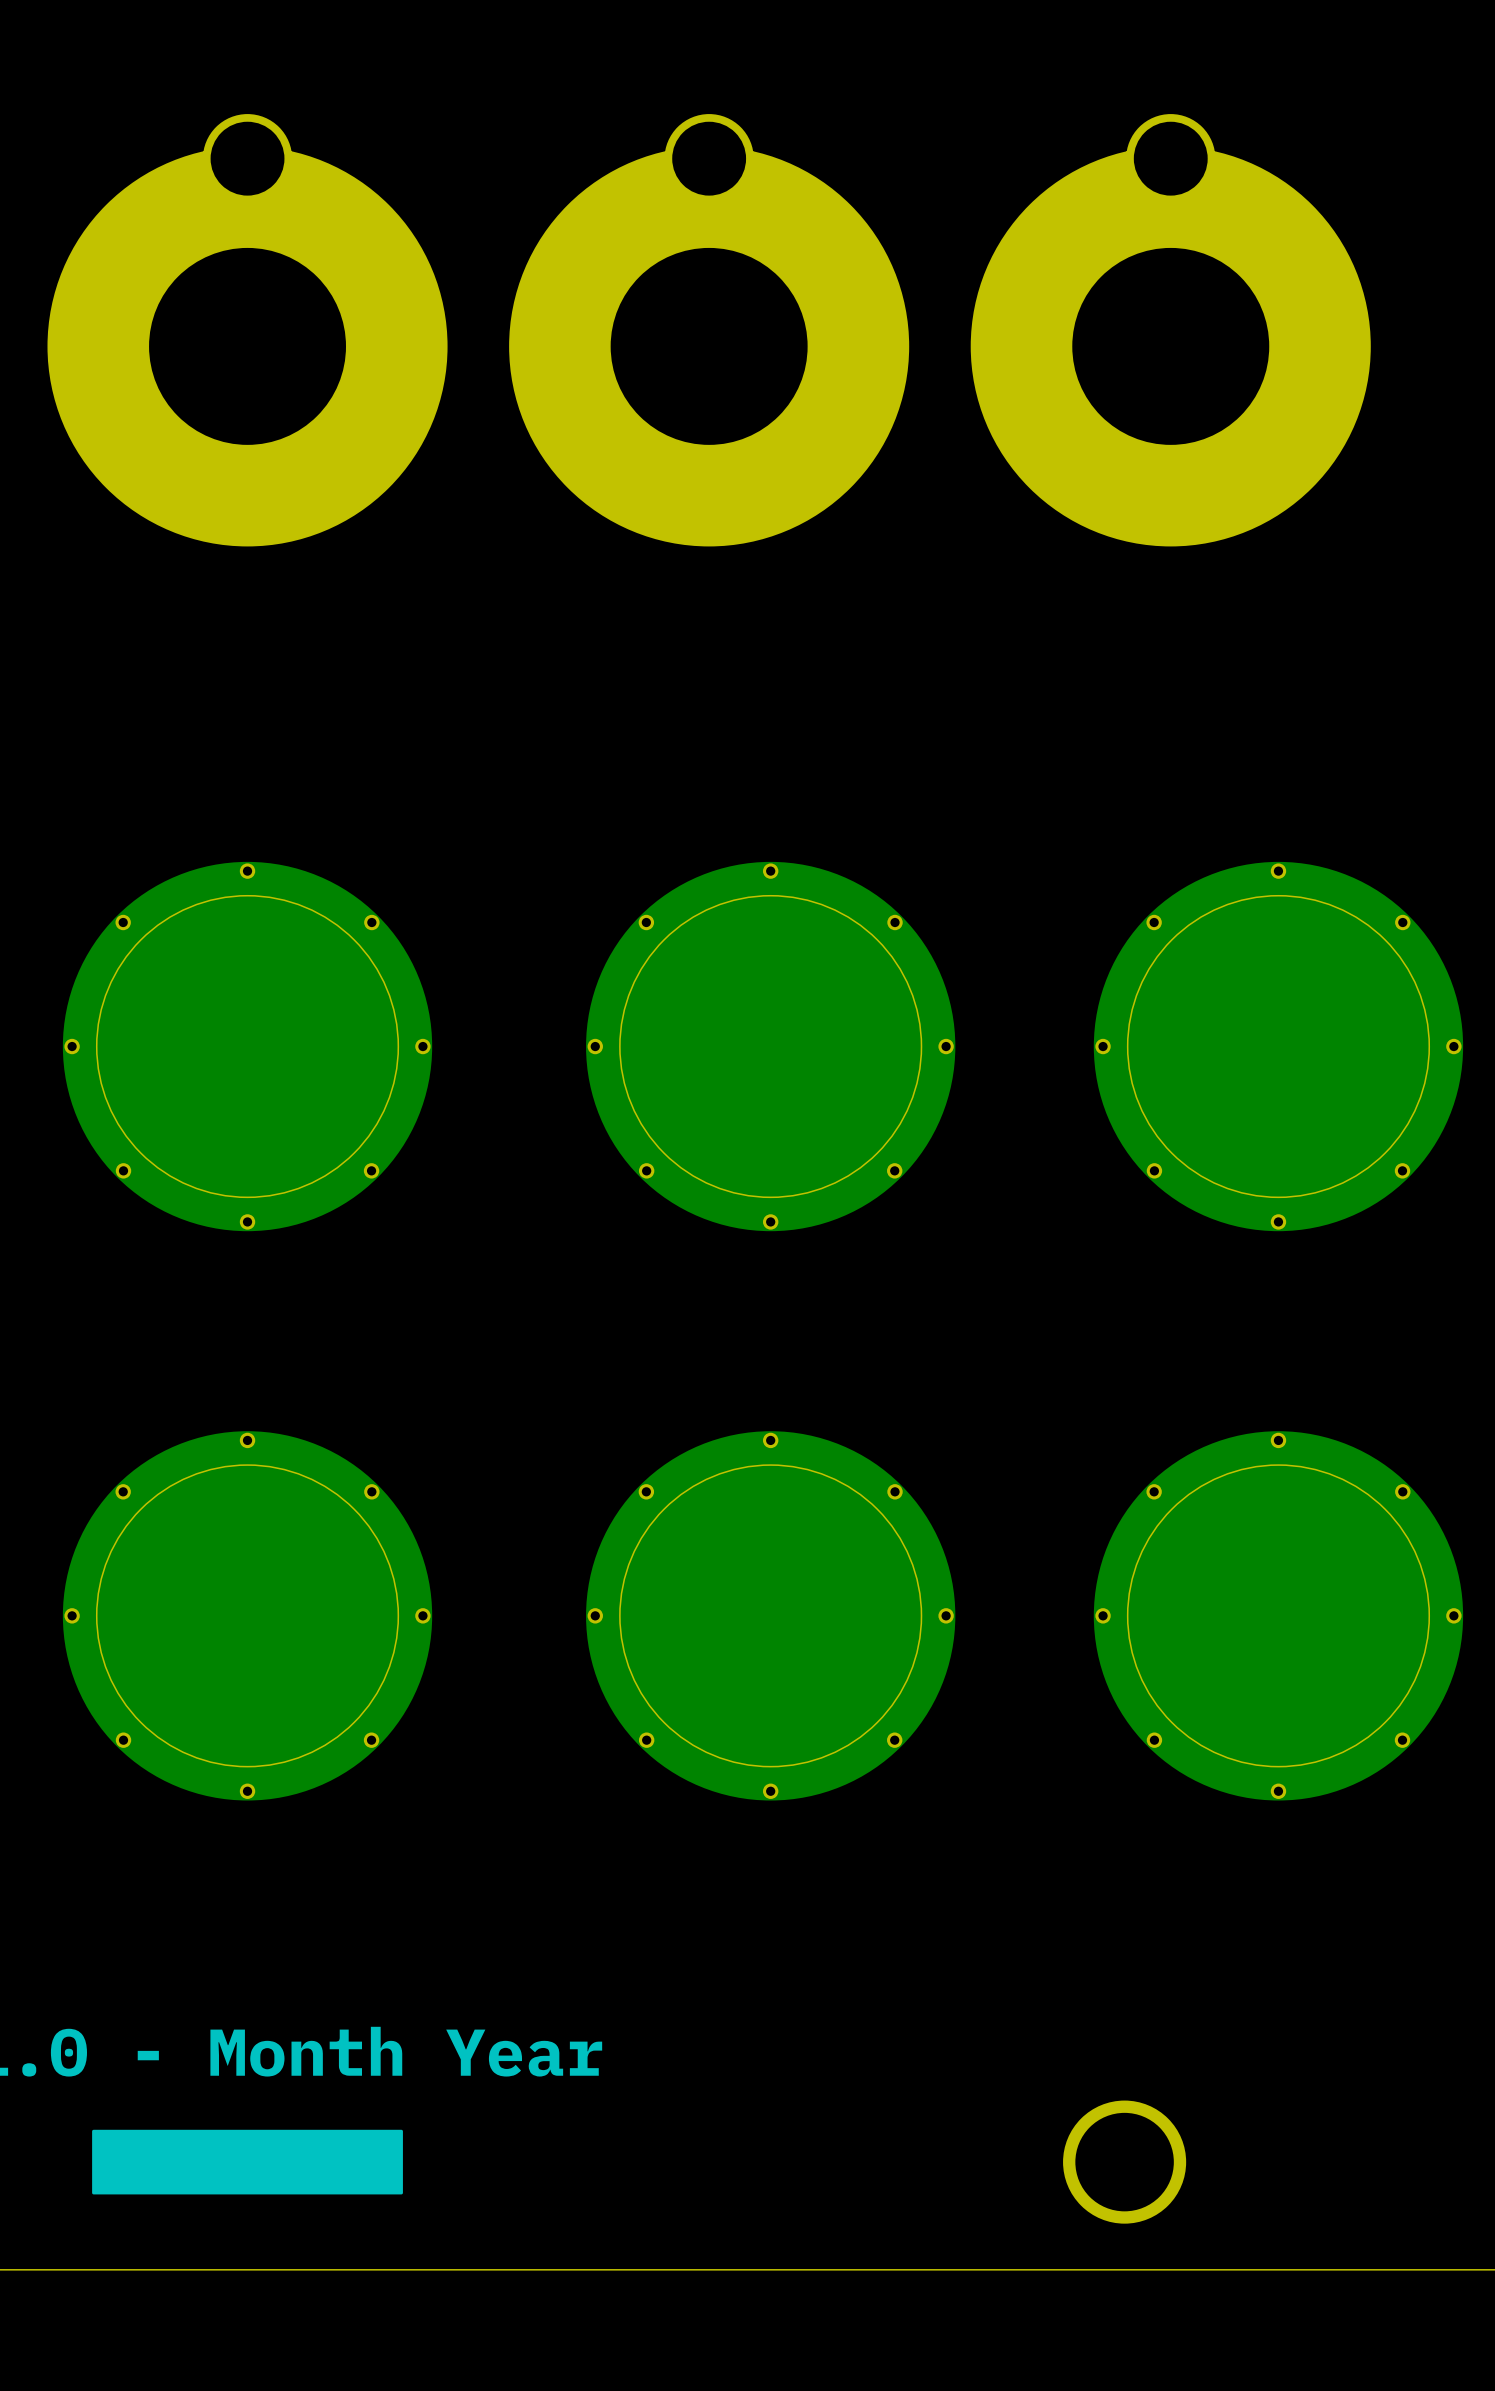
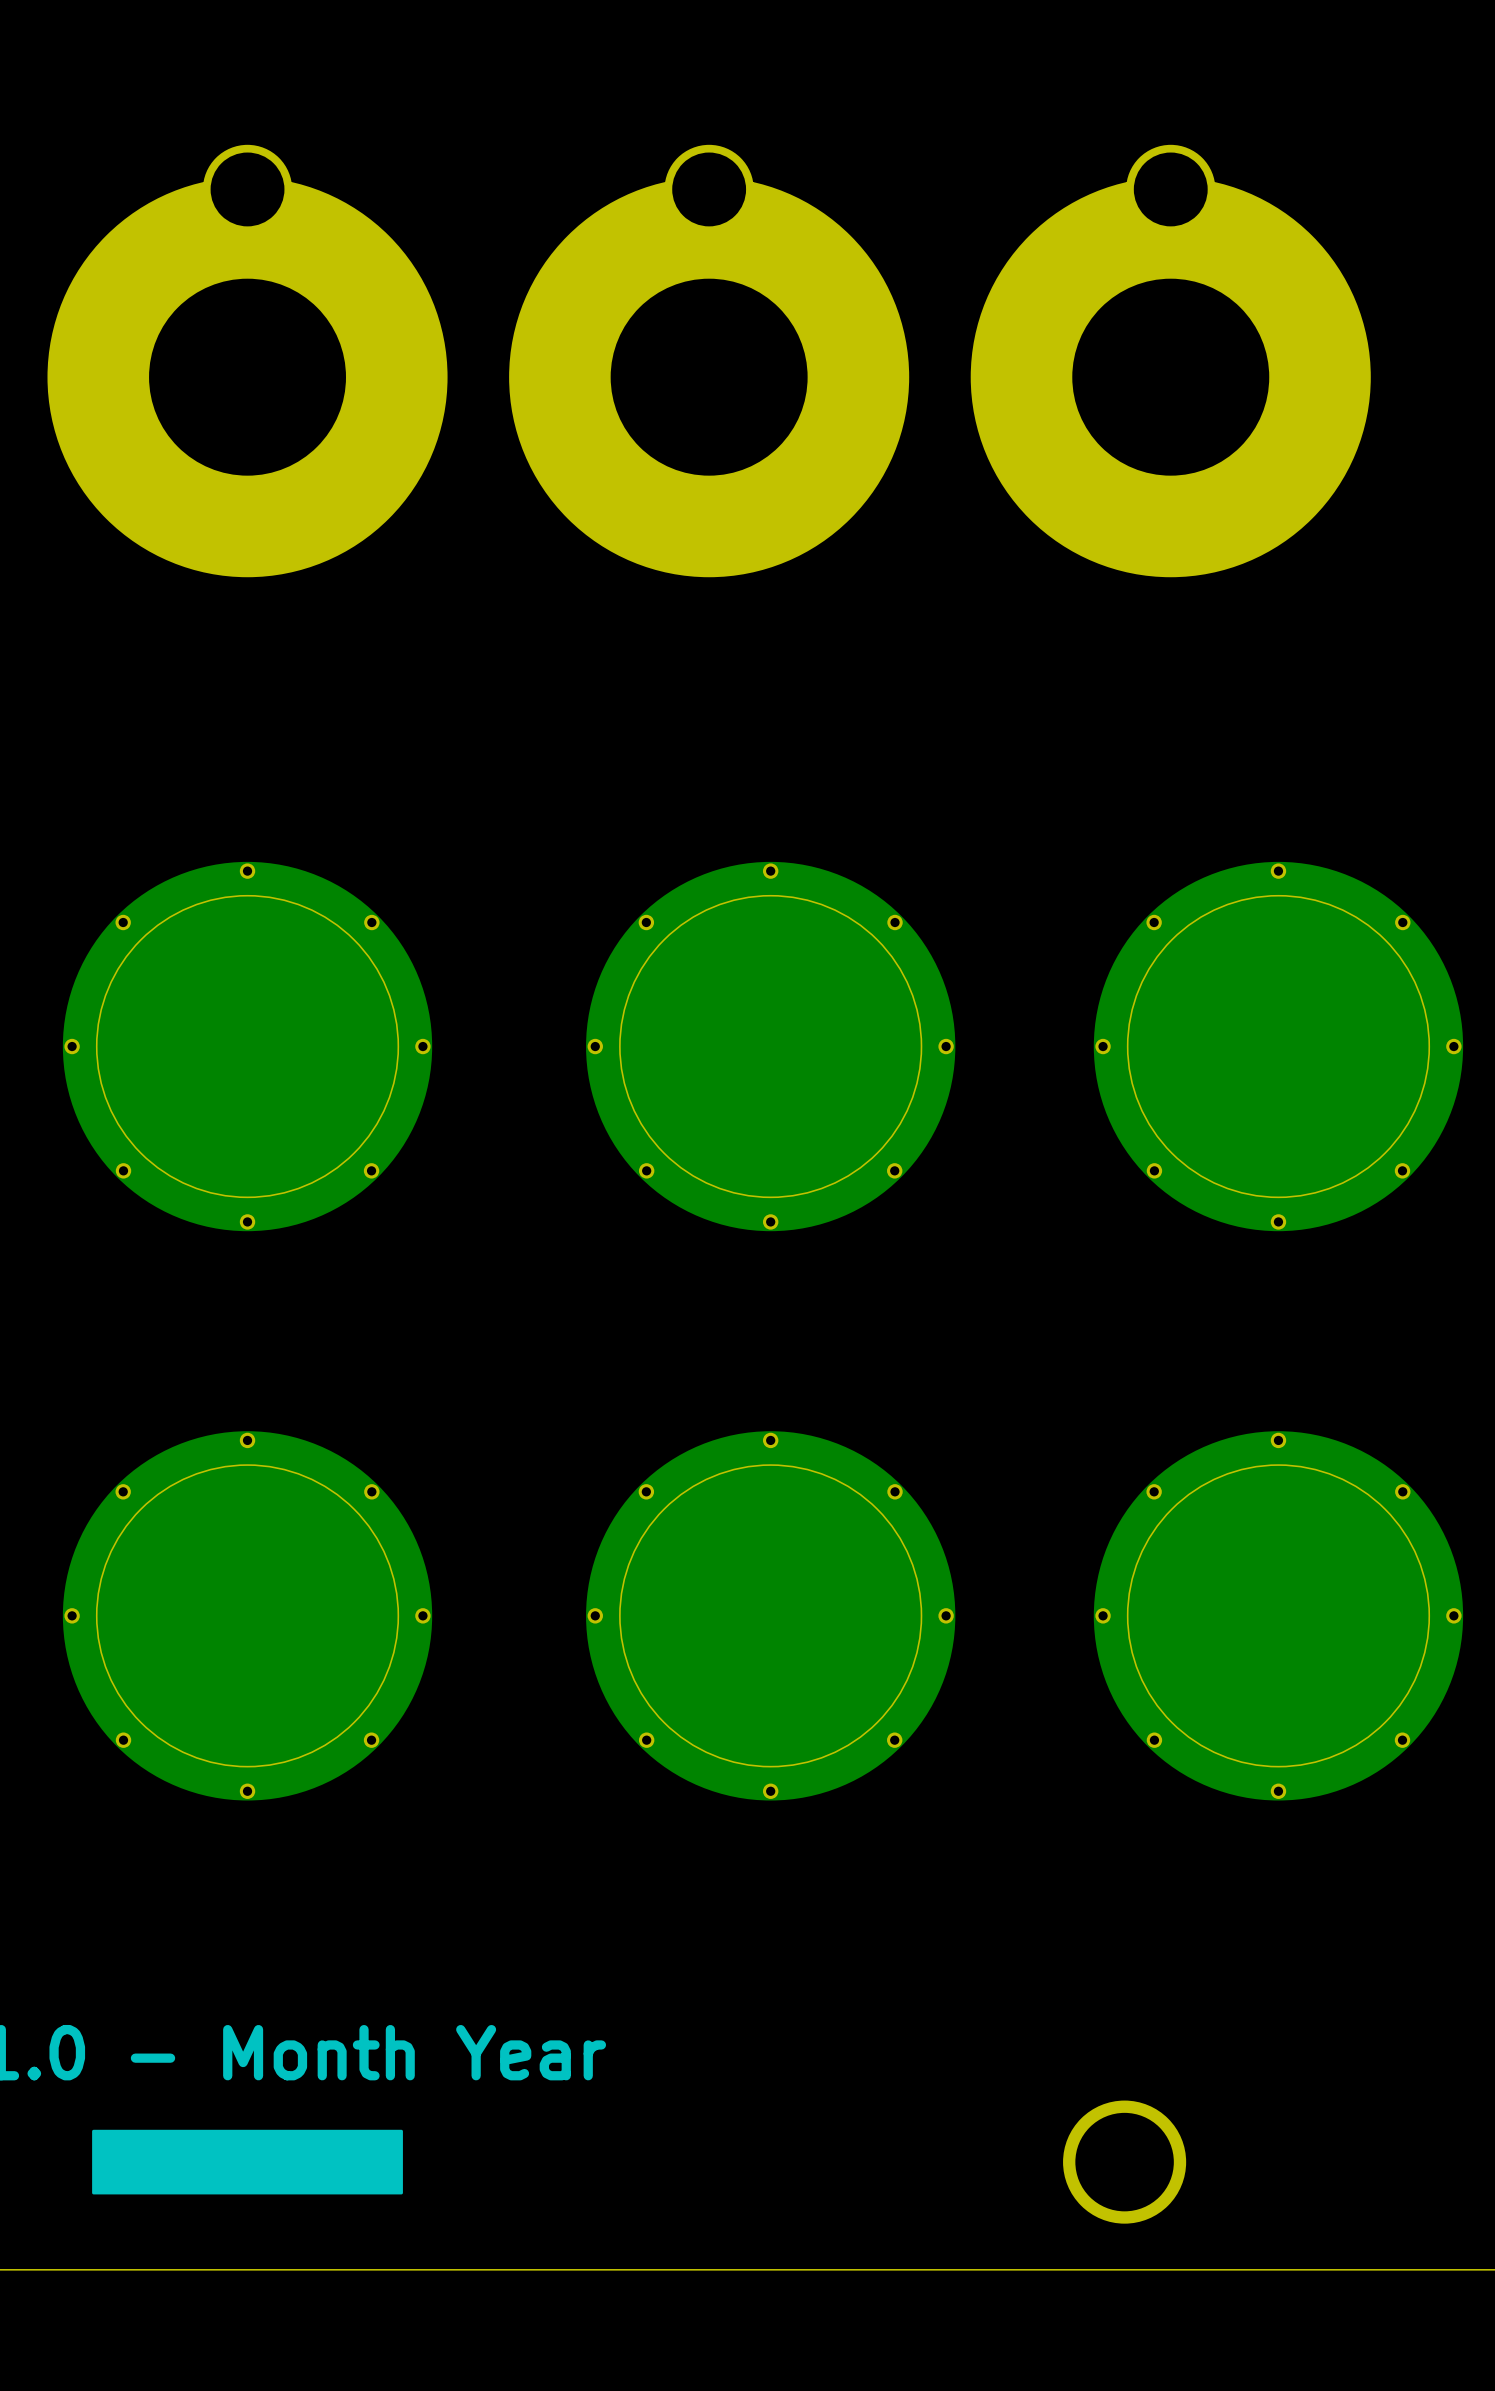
part position: (247, 330) -> (247, 361)
part position: (709, 330) -> (709, 361)
part position: (1170, 330) -> (1170, 361)

